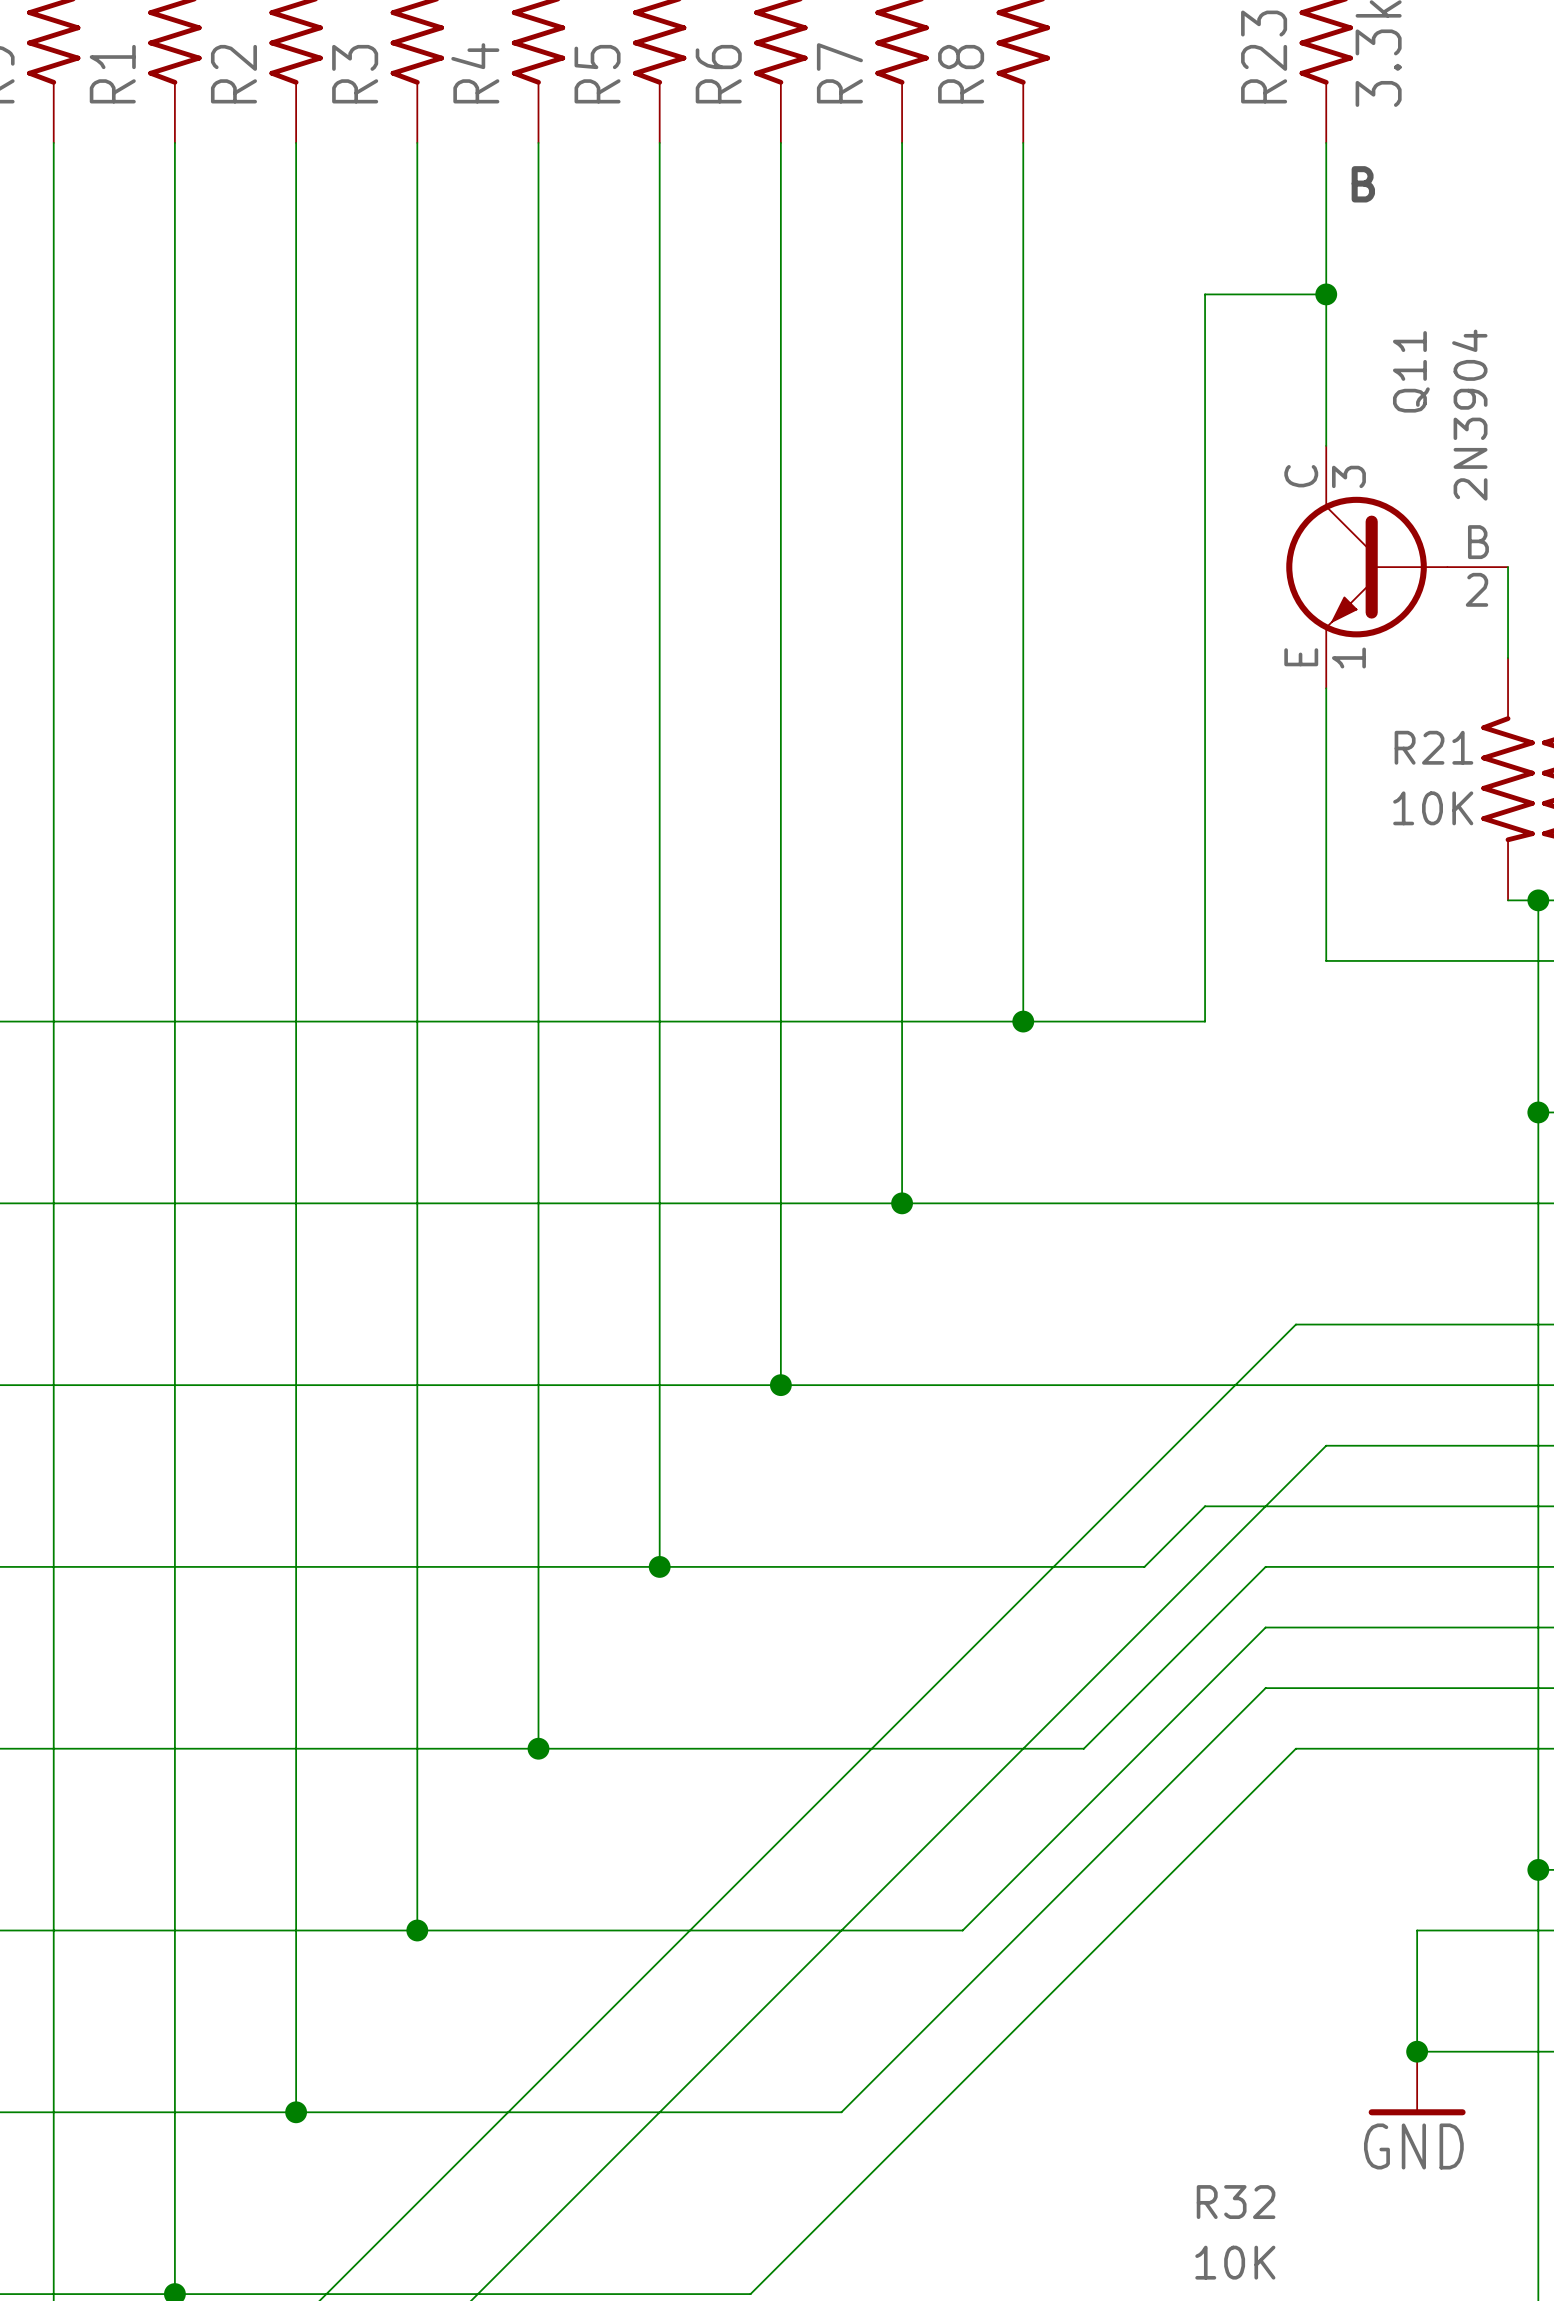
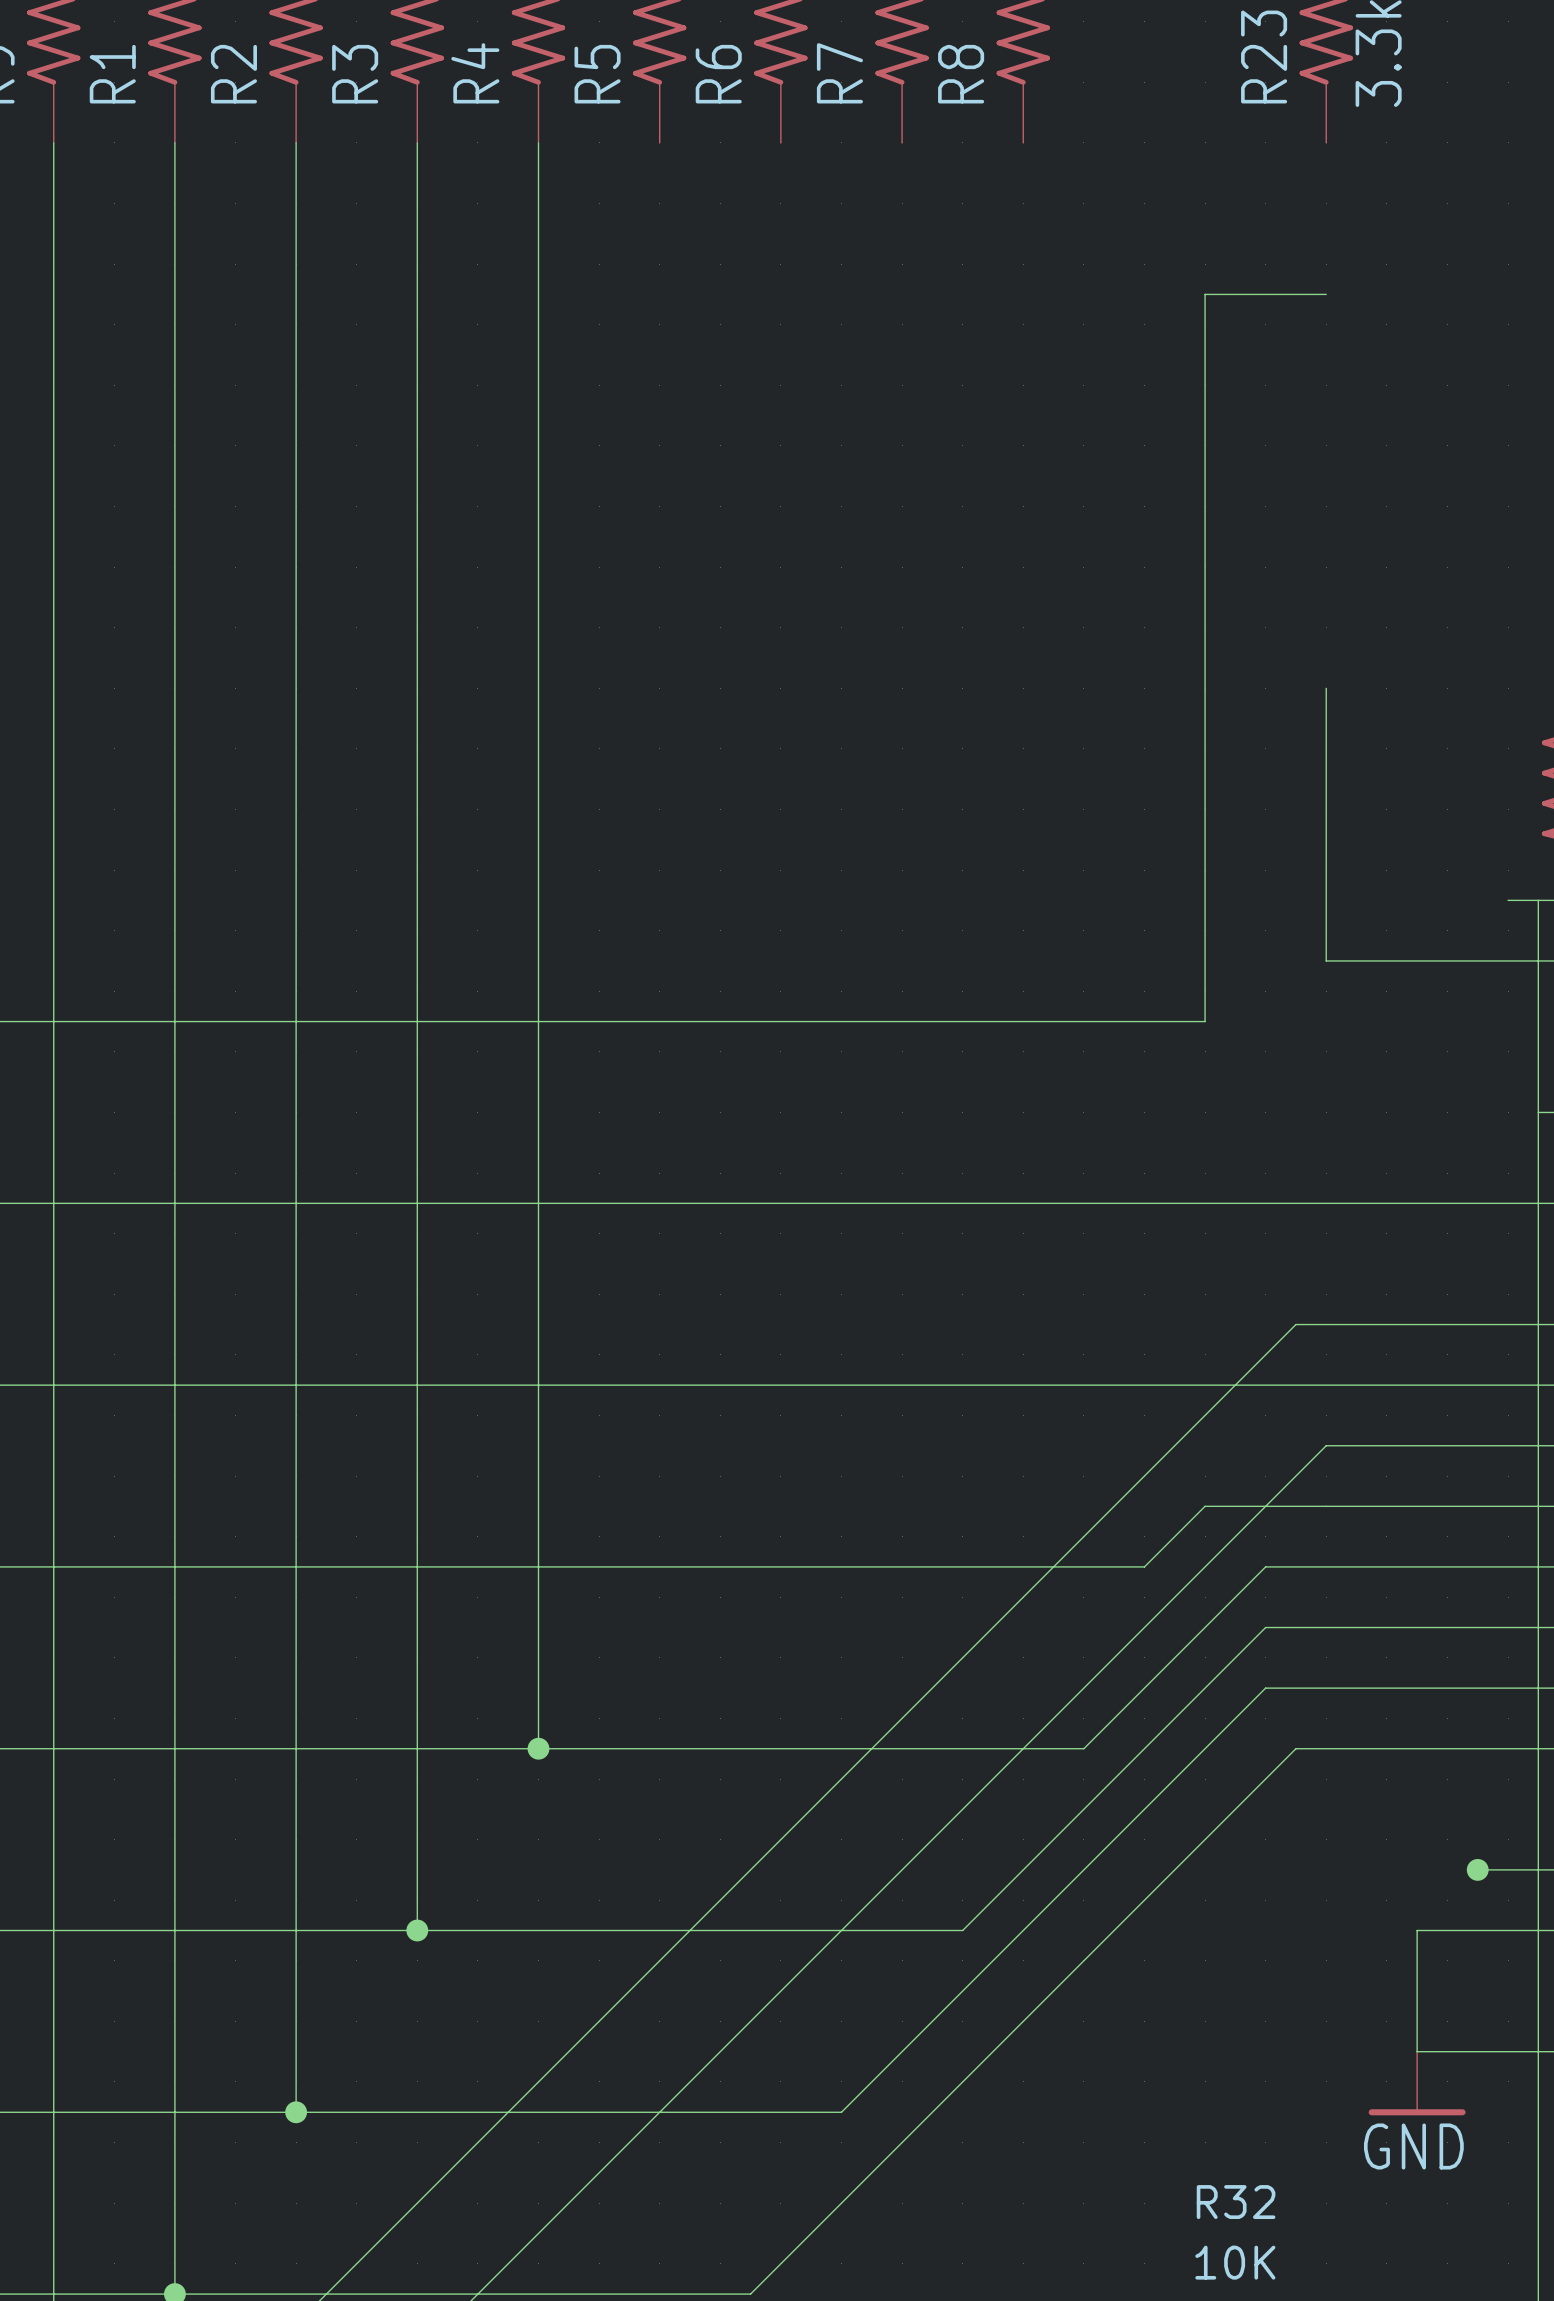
wire: (659, 142) (659, 1566) -> none
wire: (780, 142) (780, 1385) -> none
wire: (902, 142) (902, 1203) -> none
wire: (1023, 142) (1023, 1021) -> none
wire: (1326, 142) (1326, 445) -> none
text: B (1363, 184) -> none
junction: (1326, 294) -> none
Q11: 2N3904 (1397, 567) -> none
wire: (1508, 567) (1508, 657) -> none
R21: 10K (1508, 779) -> none
junction: (1538, 900) -> none
junction: (1023, 1021) -> none
junction: (1538, 1112) -> none
junction: (902, 1203) -> none
junction: (780, 1385) -> none
junction: (659, 1566) -> none
wire: none -> (1477, 1869) (1538, 1869)
junction position: (1538, 1869) -> (1477, 1869)
junction: (1417, 2051) -> none

